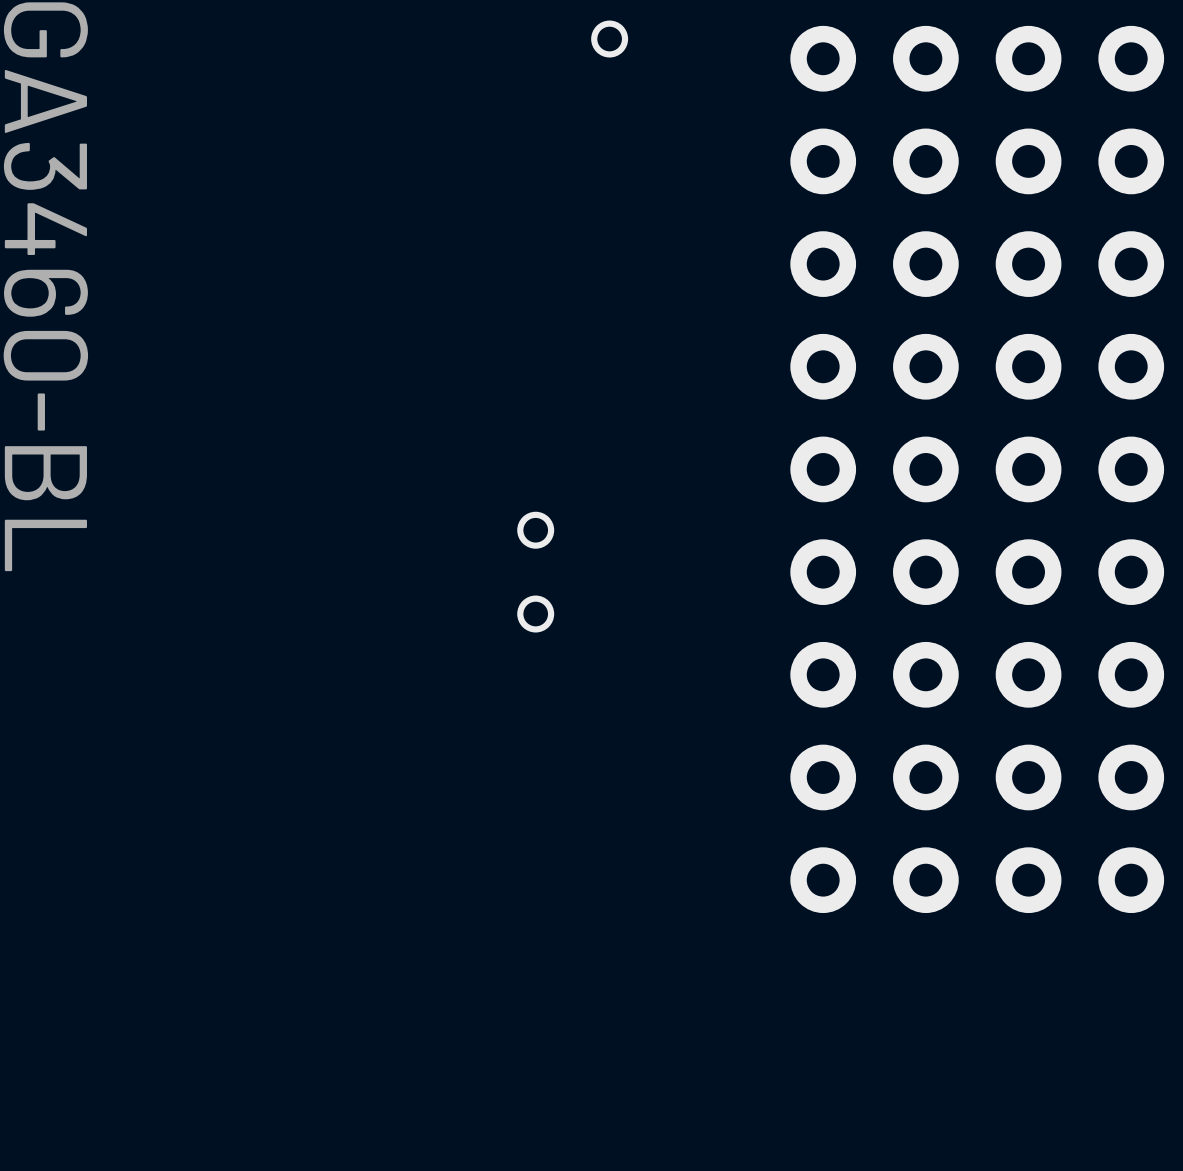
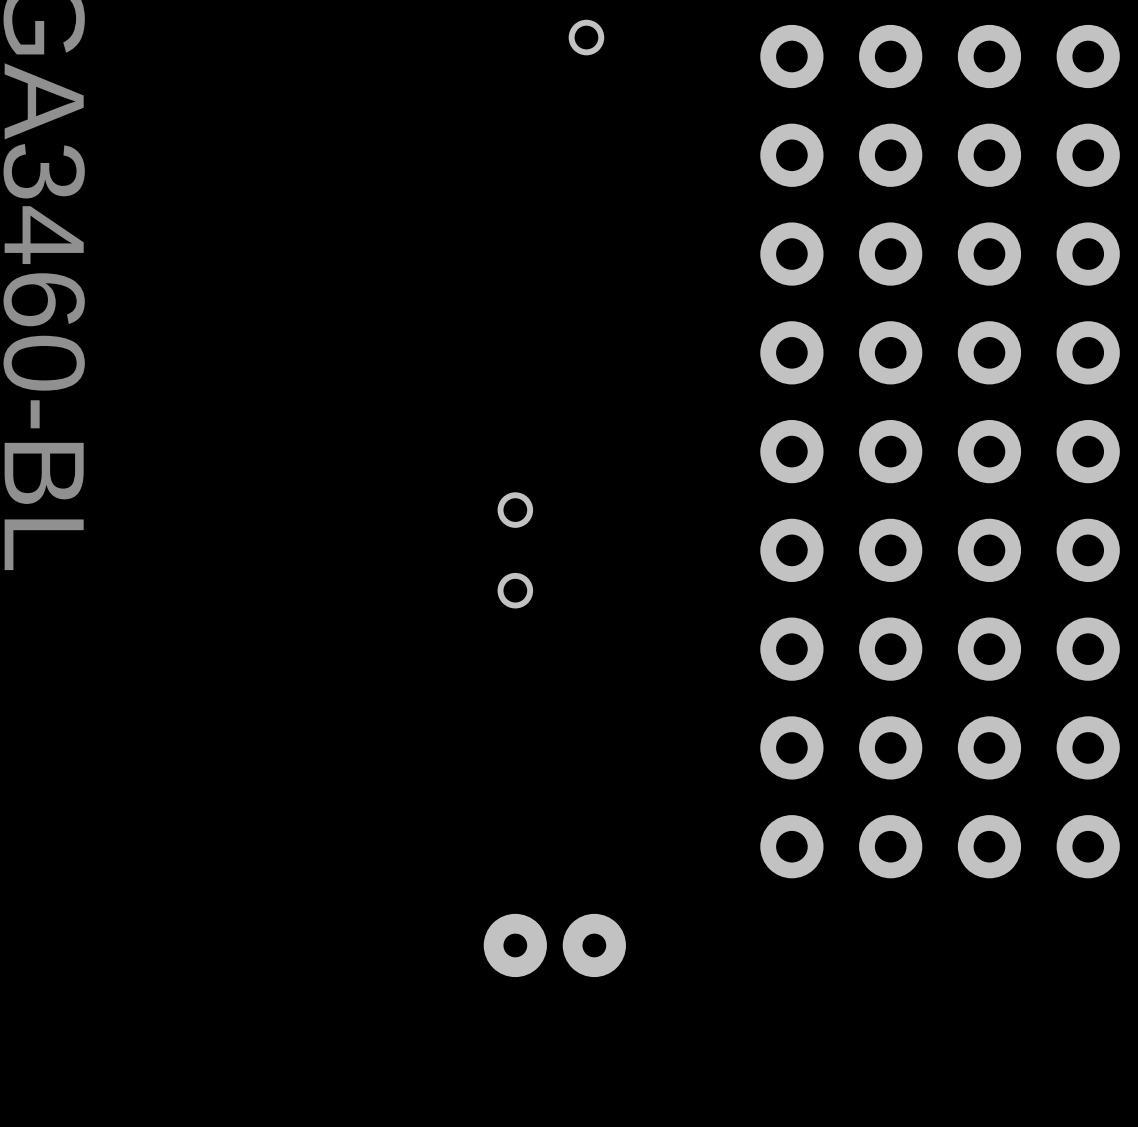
via: none -> (515, 945)
via: none -> (594, 945)

